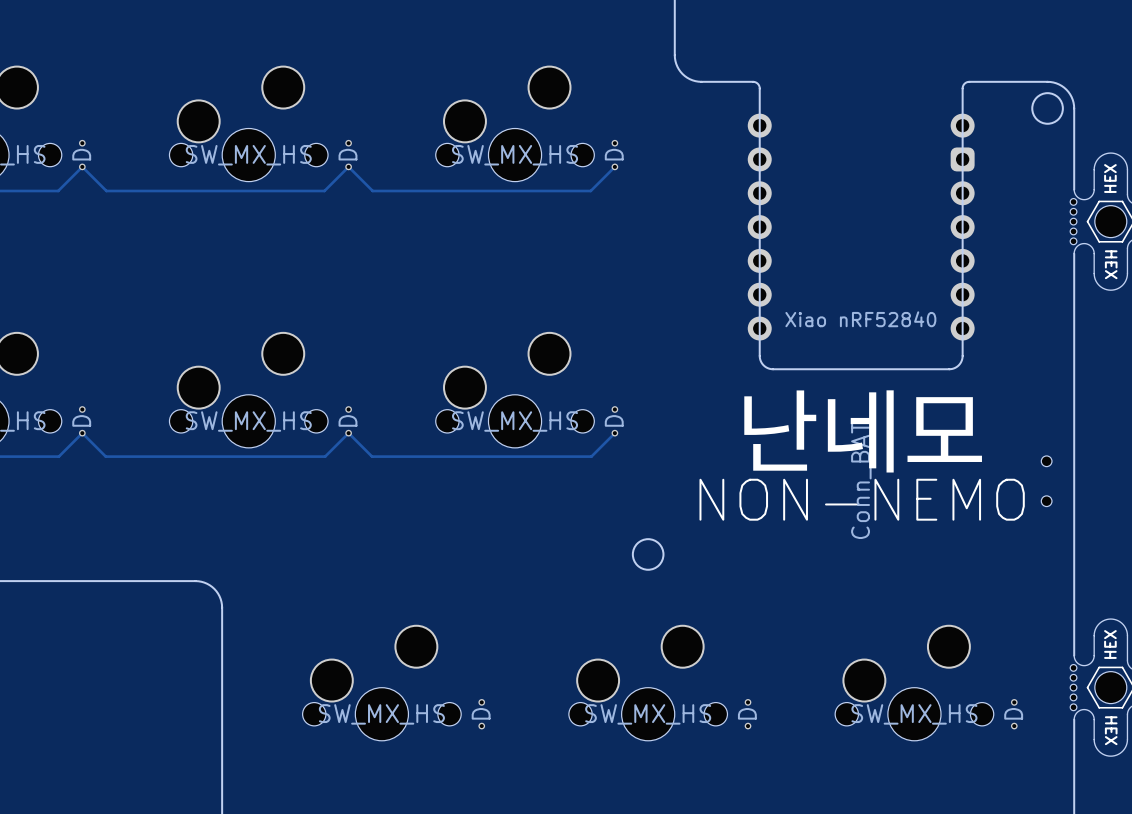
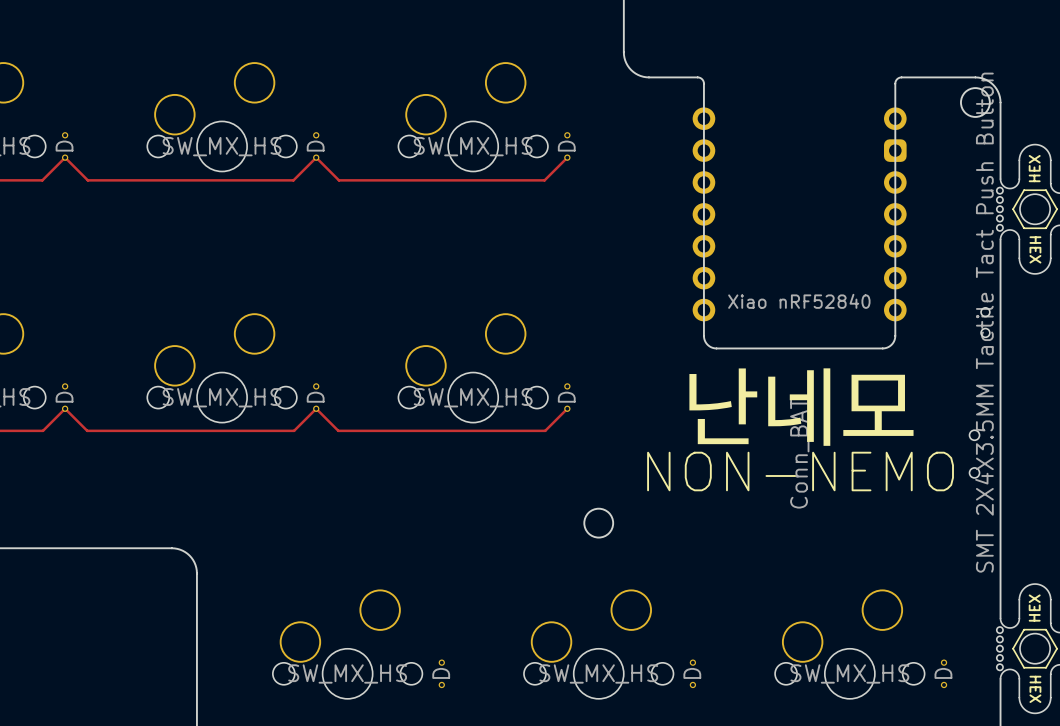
part: none -> SMT 2X4X3.5MM Tactile Tact Push Button (985, 322)

